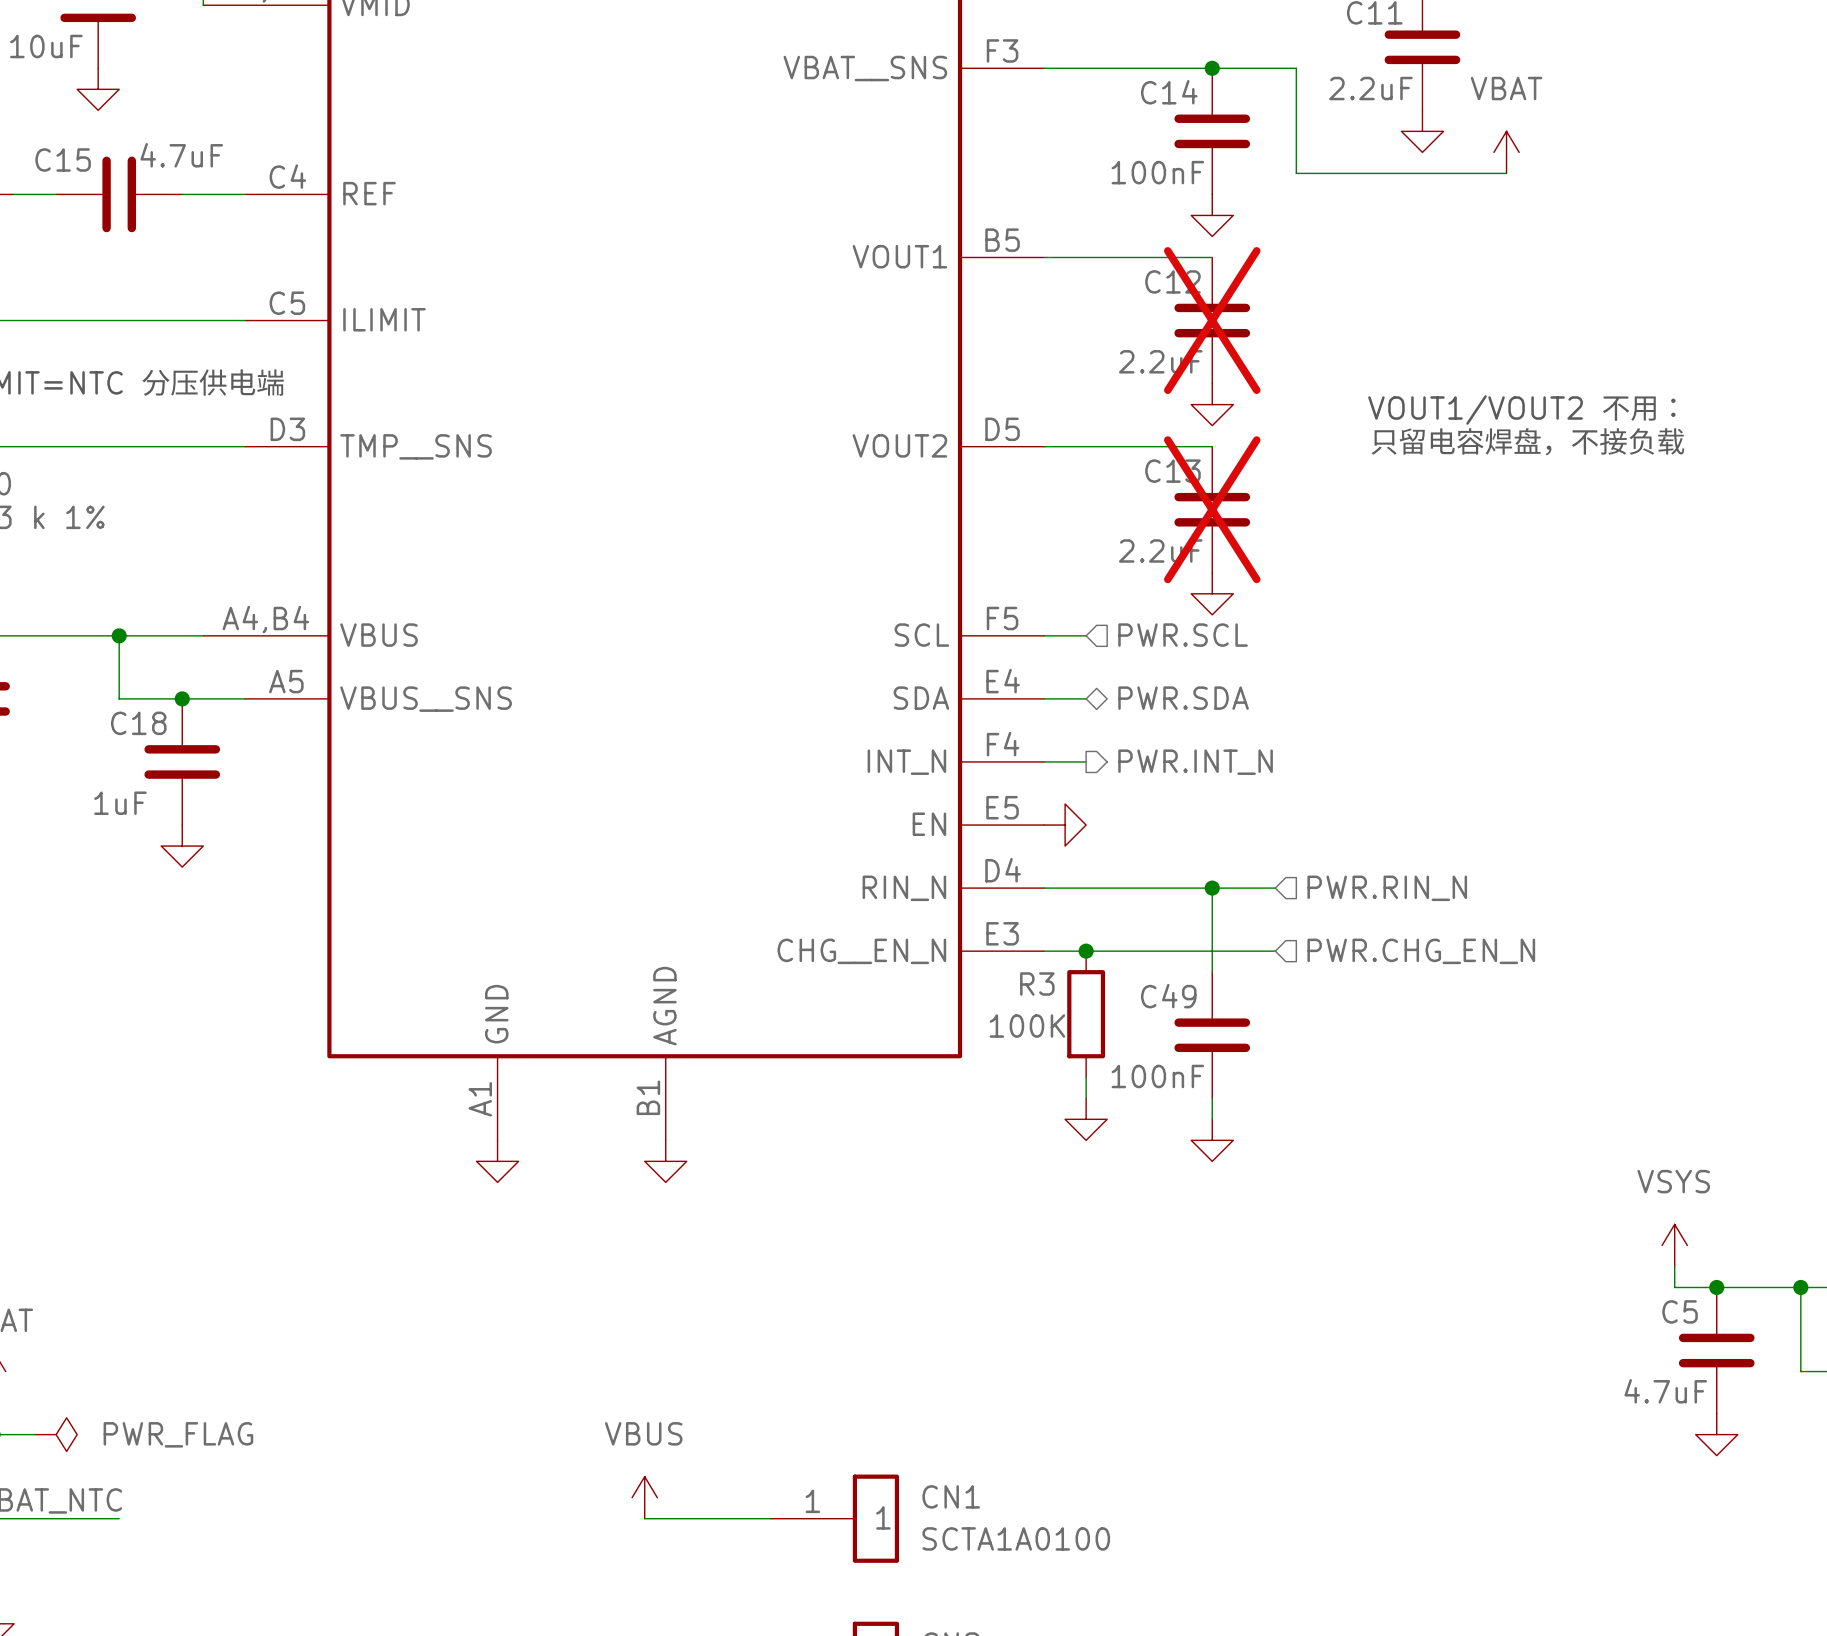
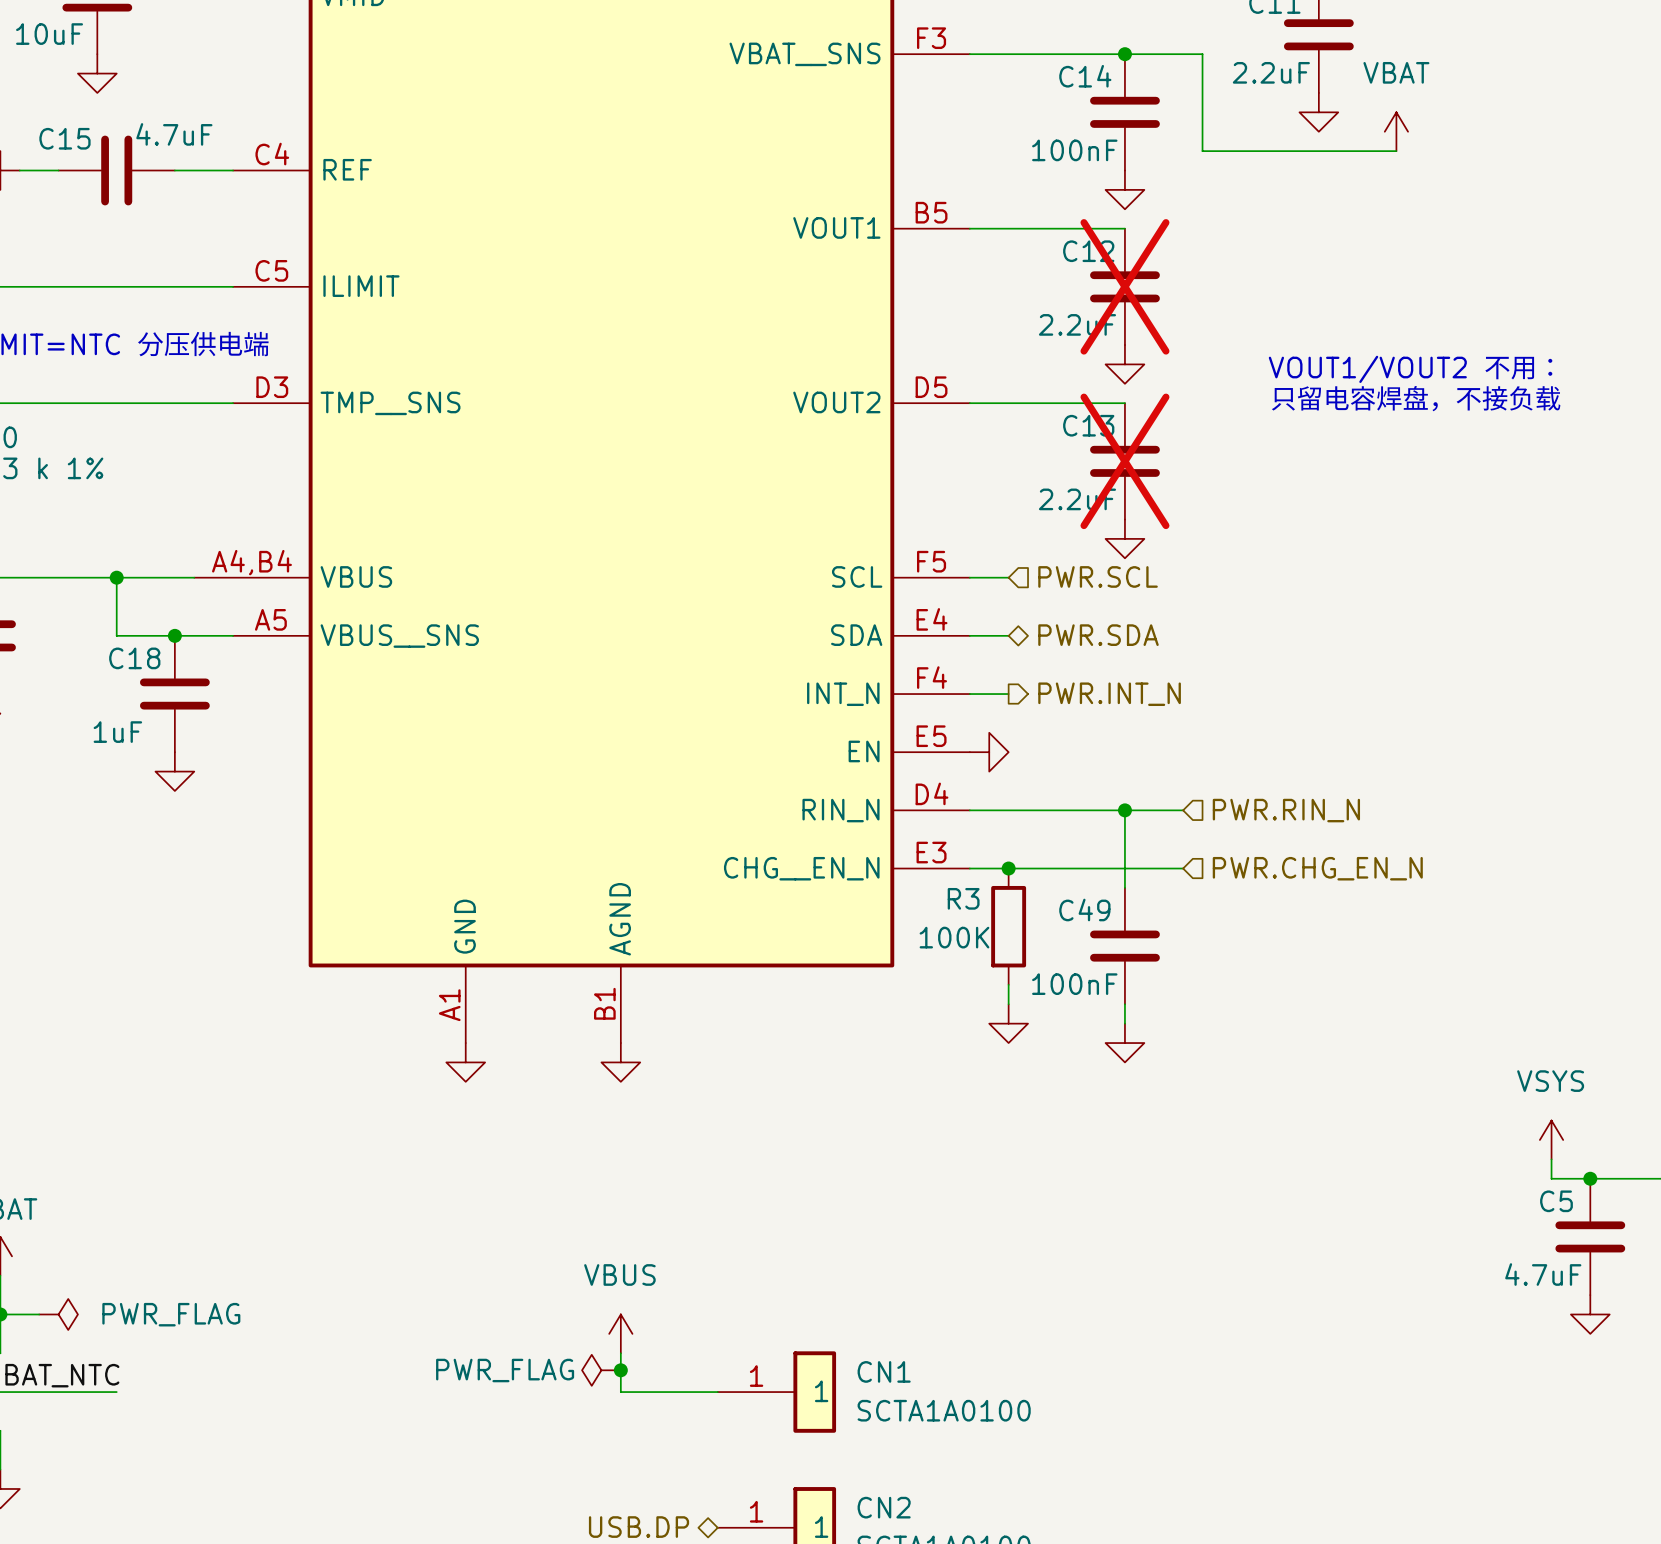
power symbol: none -> VBUS (620, 1333)
junction: none -> (620, 1370)
power symbol: VBUS (644, 1497) -> PWR_FLAG (601, 1370)
wire: (644, 1518) (665, 1518) -> (620, 1353) (620, 1392)

